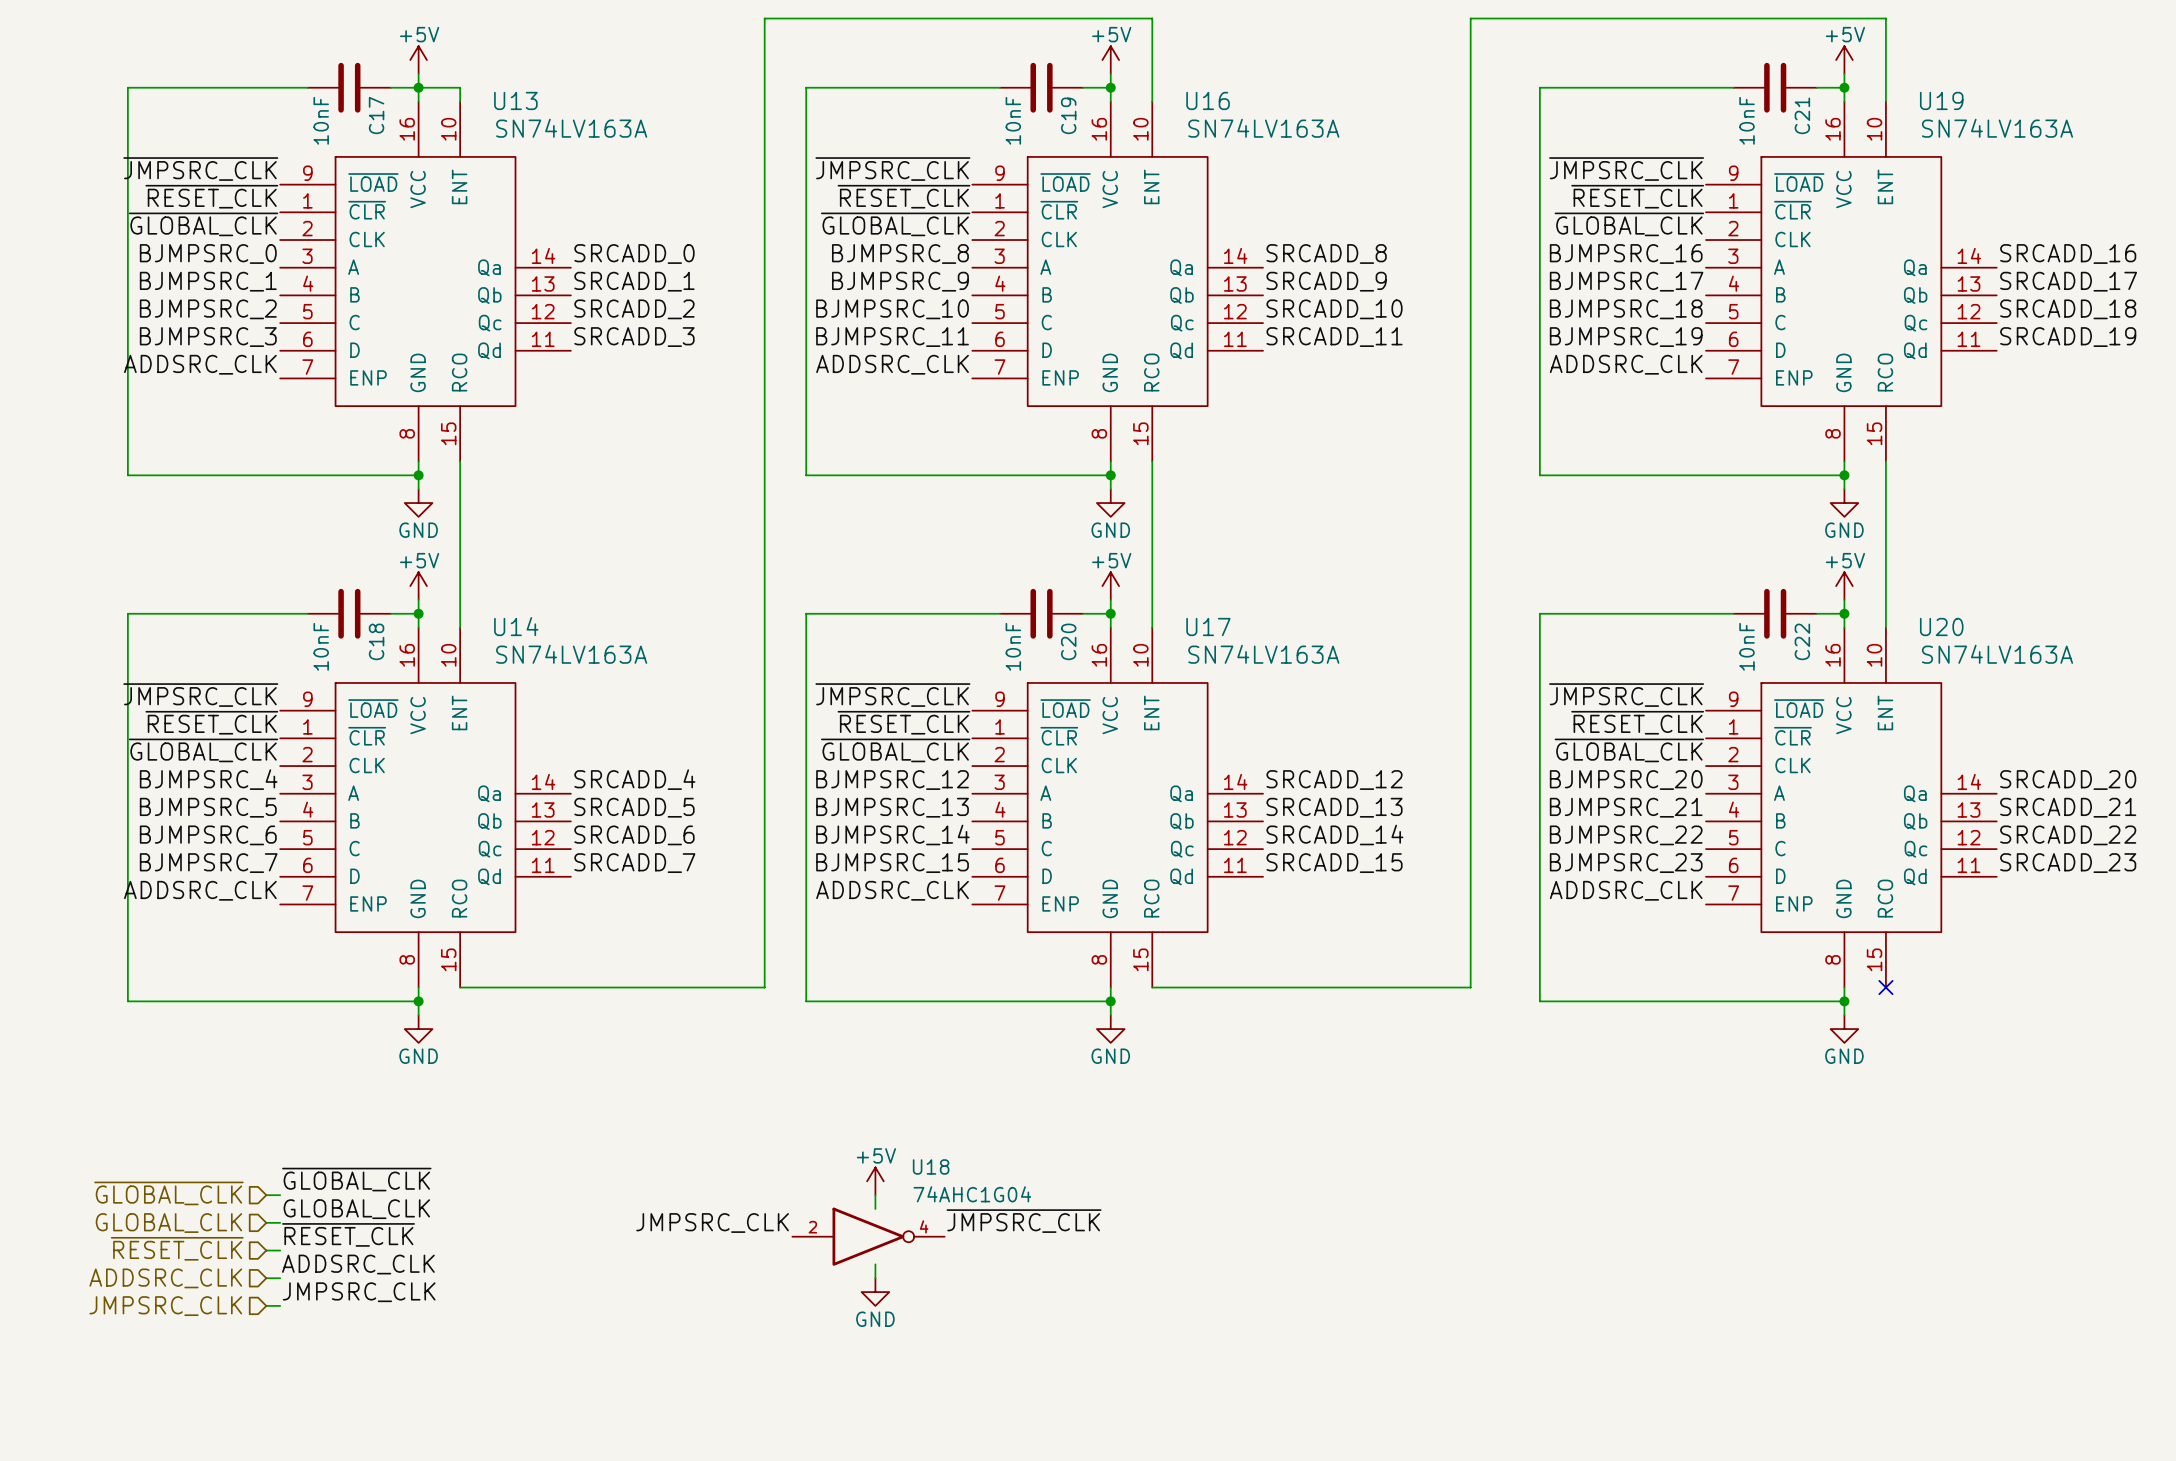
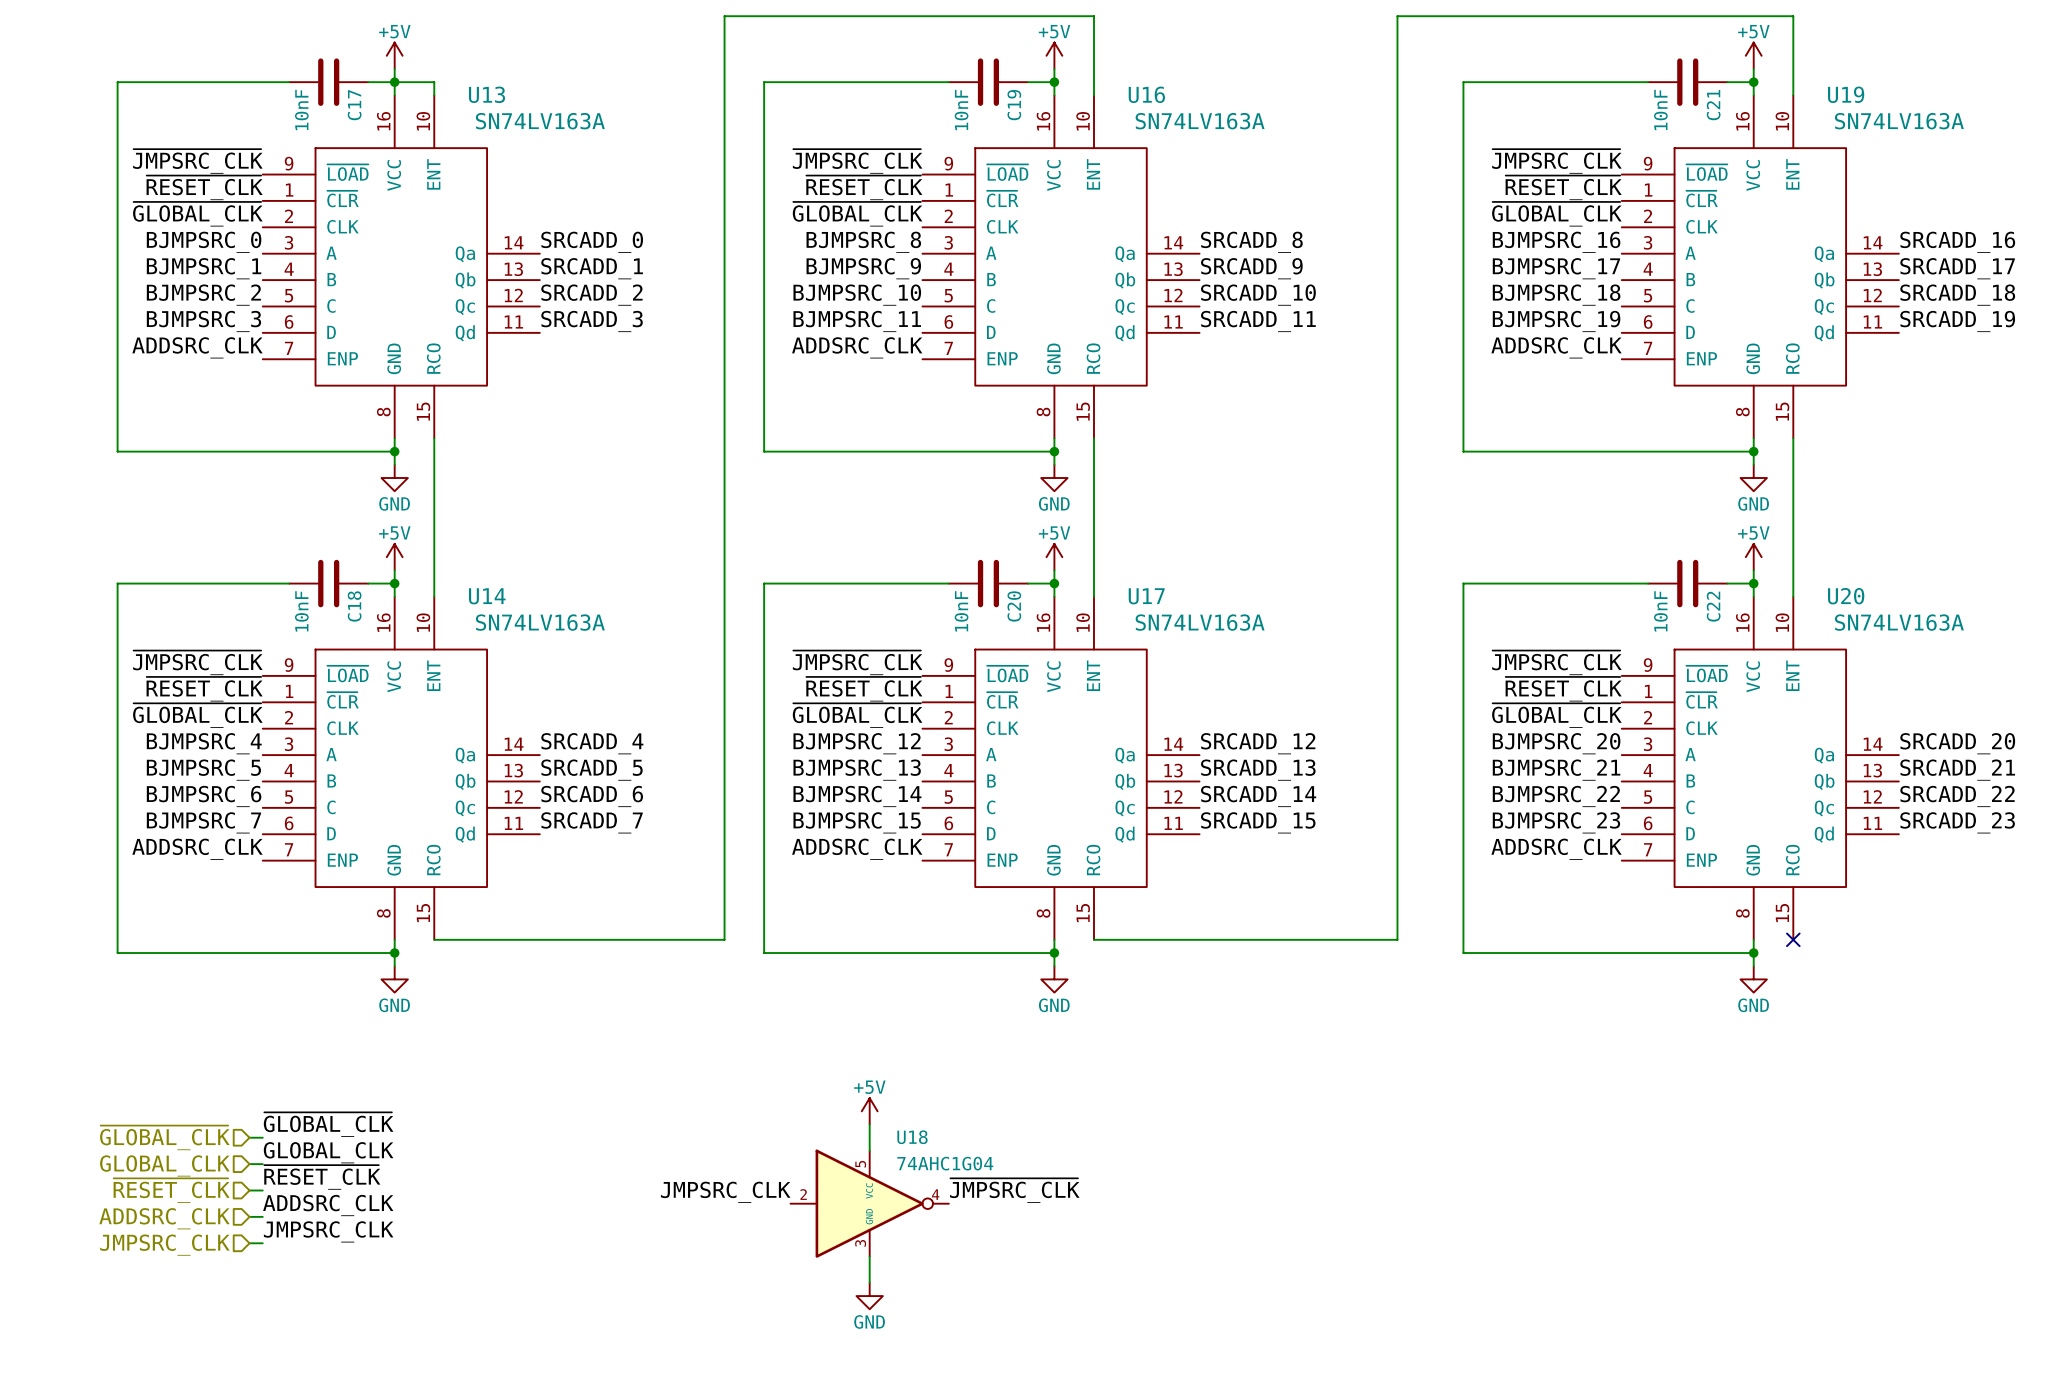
power symbol position: +5V (875, 1181) -> +5V (869, 1111)
wire: none -> (869, 1124) (869, 1150)
wire: (875, 1195) (875, 1209) -> none
U18 symbol: [792, 1207, 945, 1266] -> [790, 1149, 949, 1258]
label position: ~{JMPSRC_CLK} (1024, 1221) -> ~{JMPSRC_CLK} (1014, 1190)
label position: JMPSRC_CLK (712, 1223) -> JMPSRC_CLK (725, 1192)
power symbol position: GND (875, 1292) -> GND (869, 1296)
wire: none -> (869, 1256) (869, 1282)

